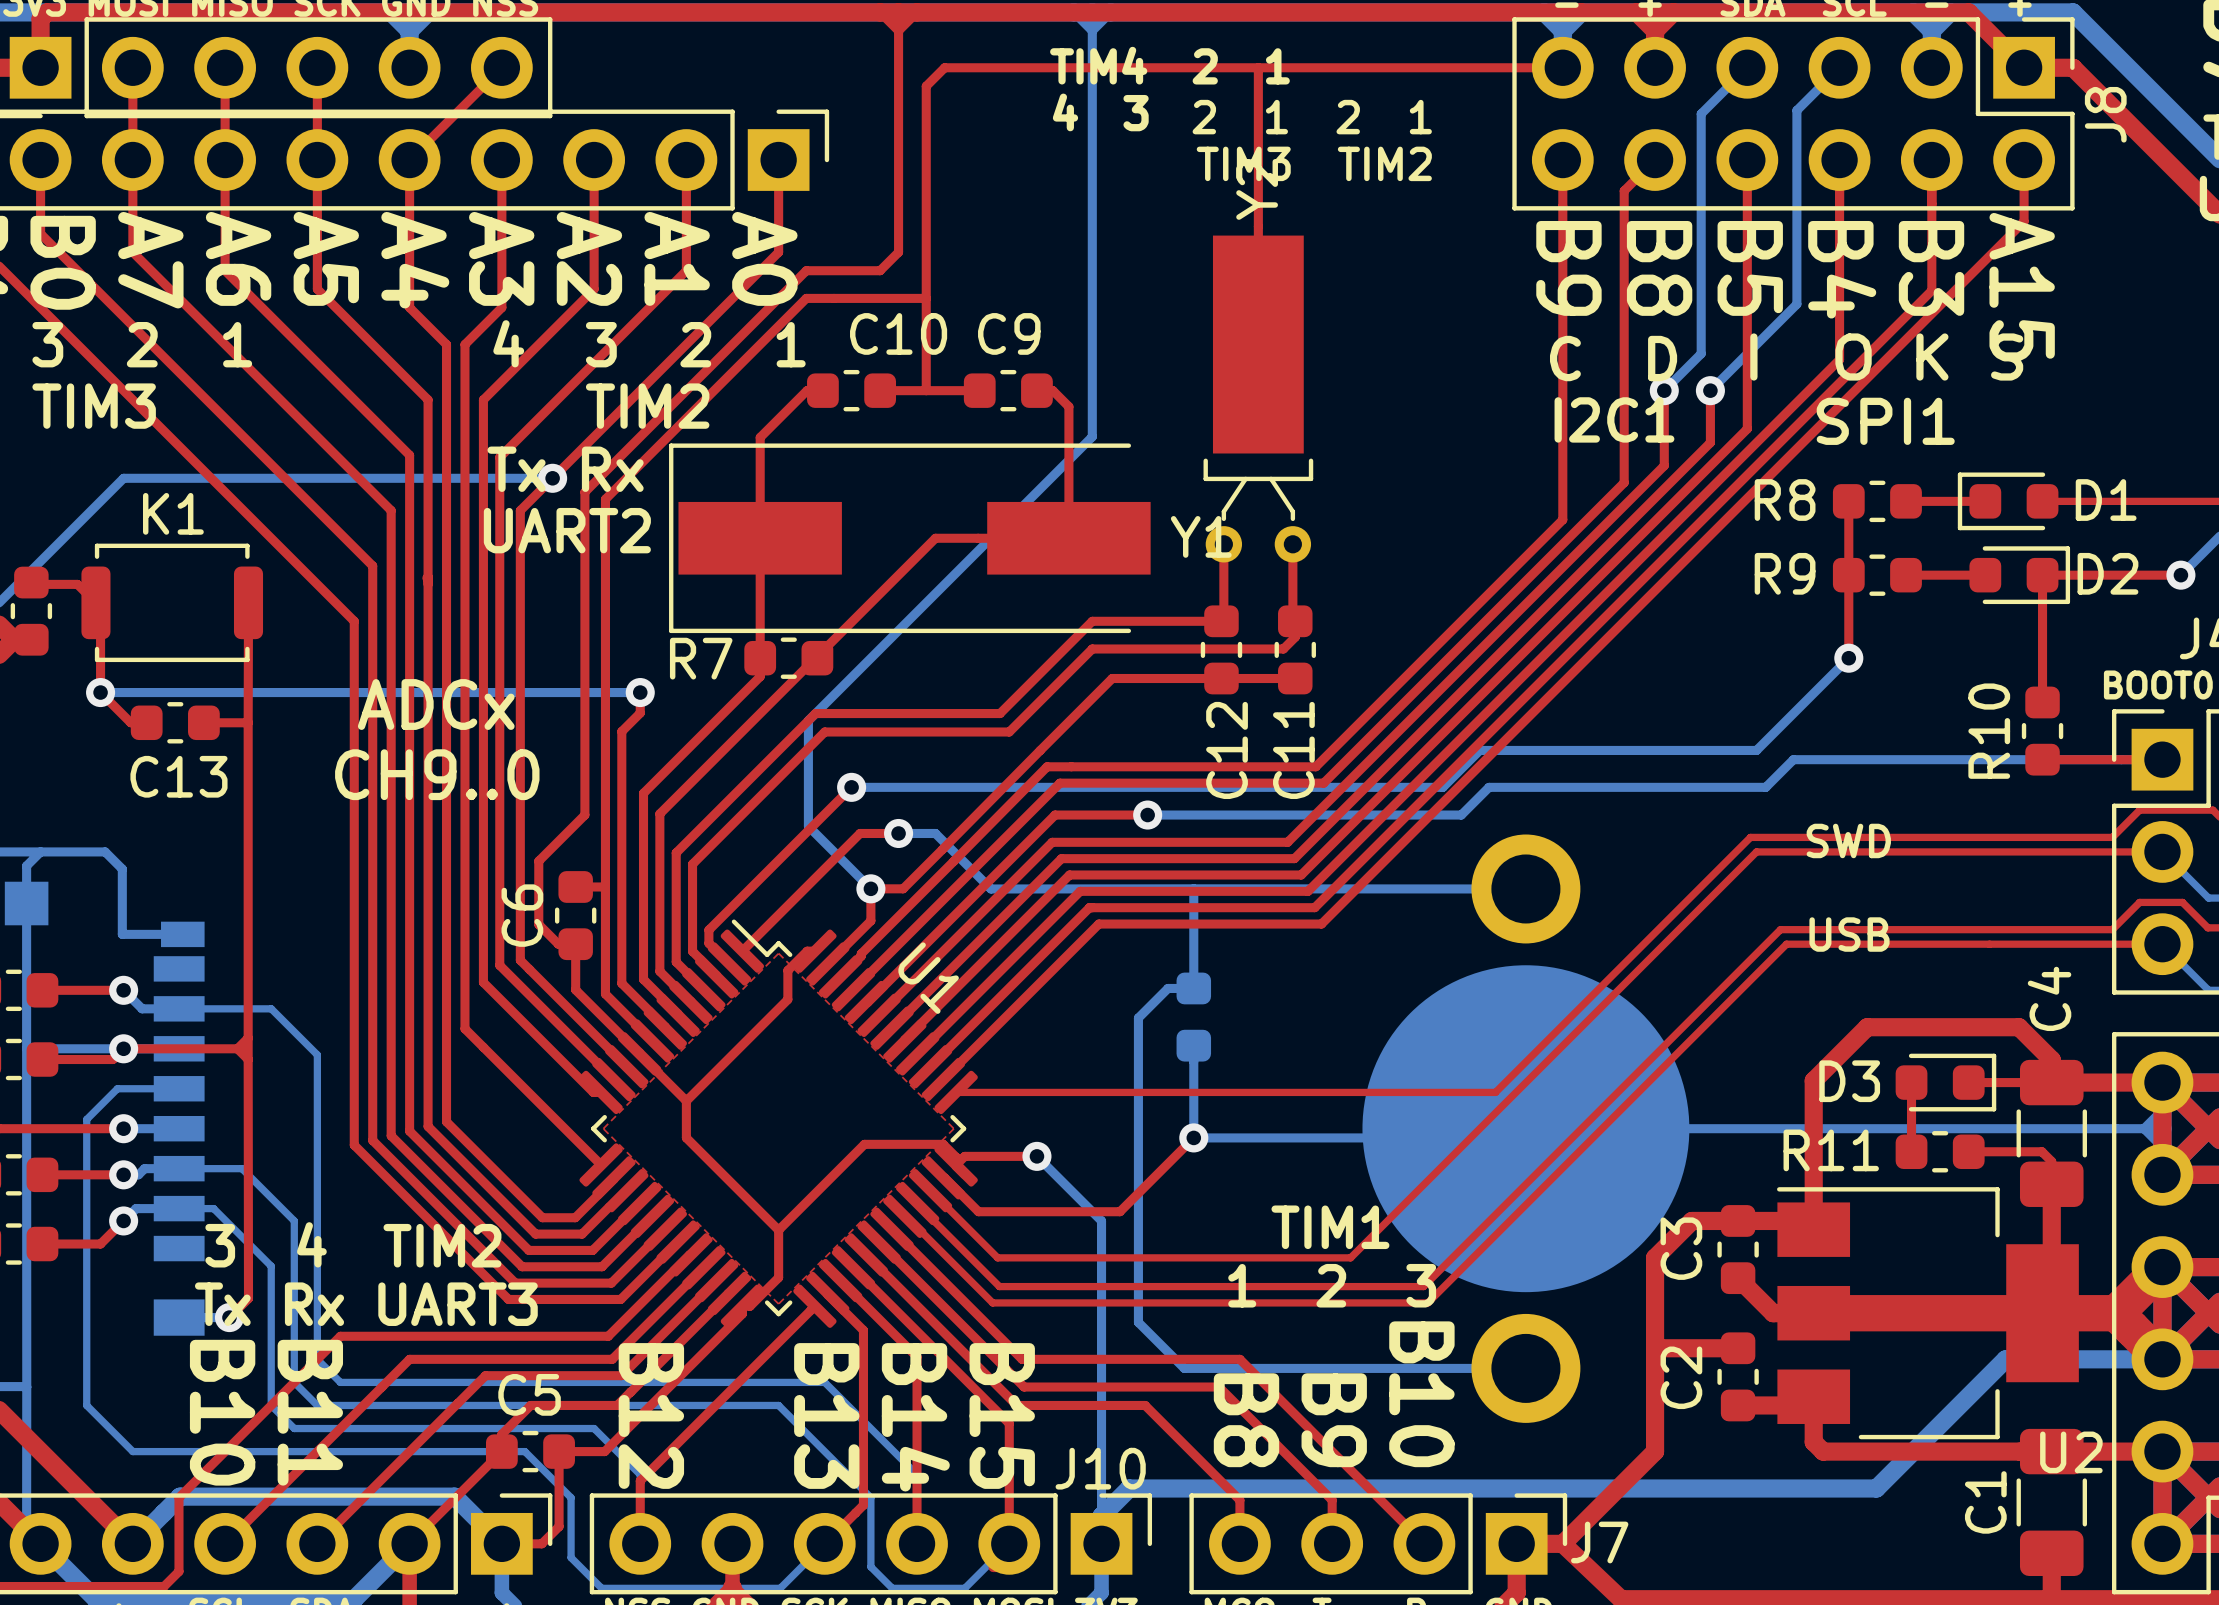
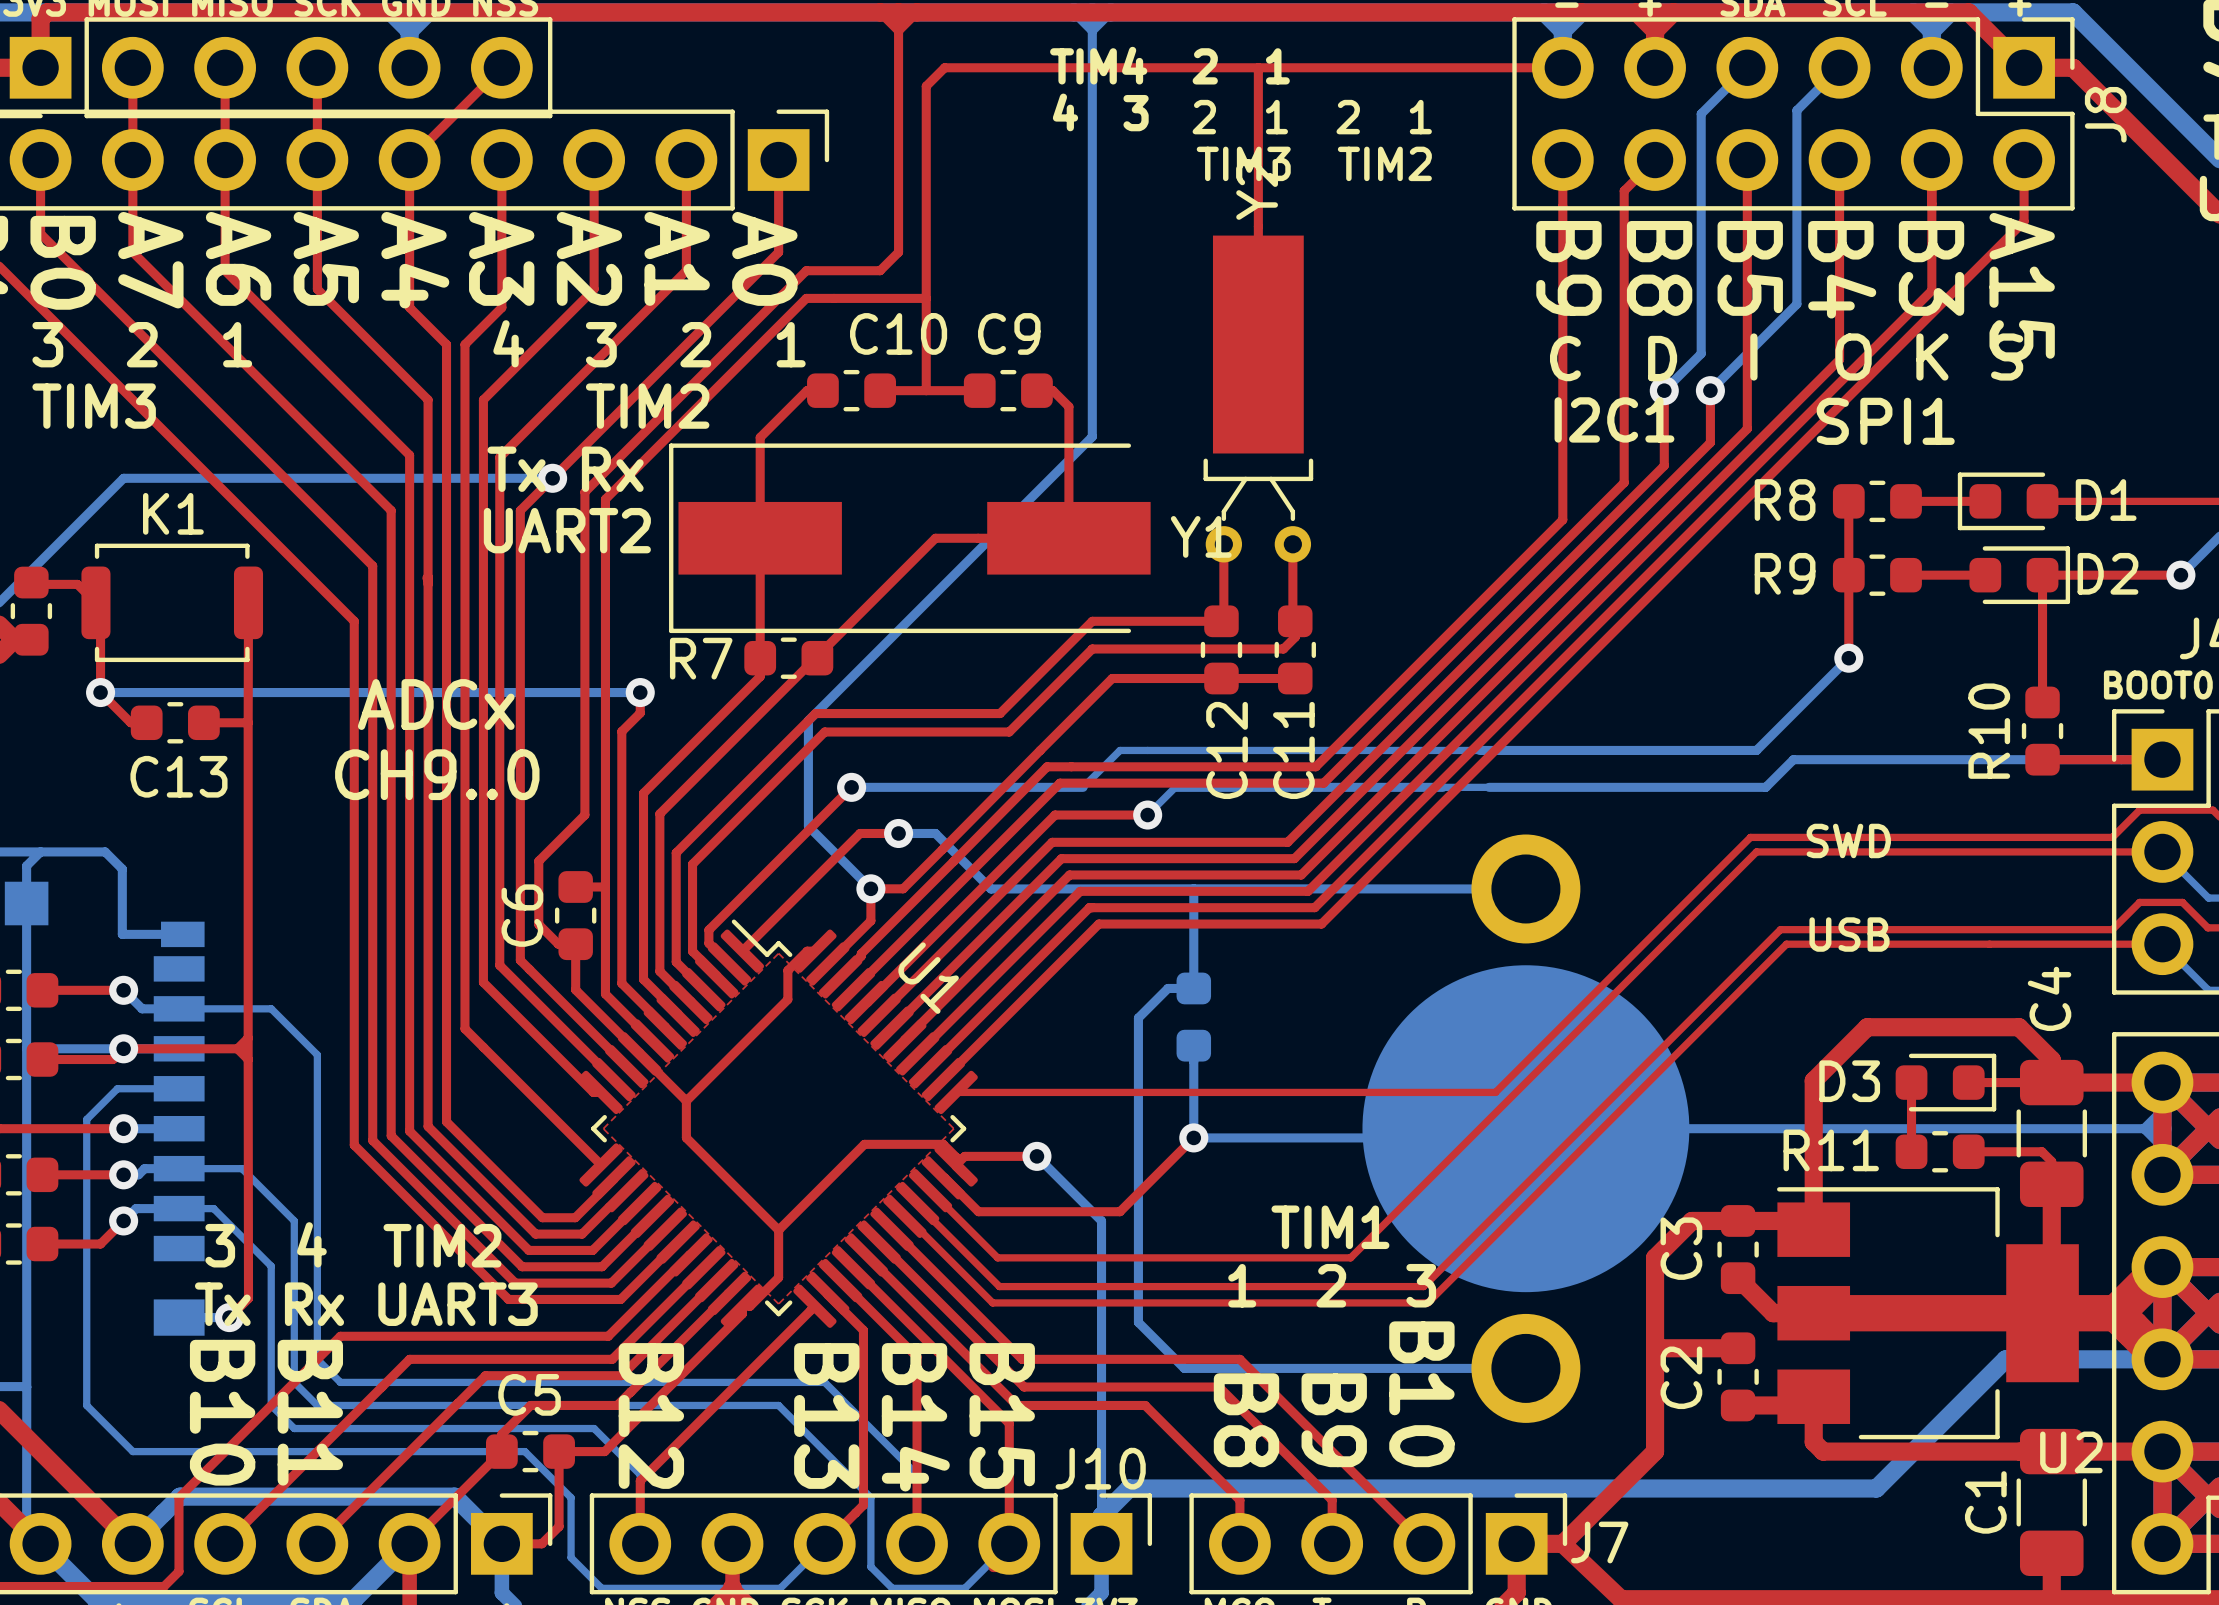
bottom track: (1479, 750) (1442, 787) -> (1489, 787) (1442, 787)
bottom track: none -> (1479, 750) (1119, 750) (1083, 787)
bottom track: (1083, 787) (1175, 787) -> (1147, 815) (1175, 787)
bottom track: (1489, 787) (1461, 815) (1147, 815) -> none

